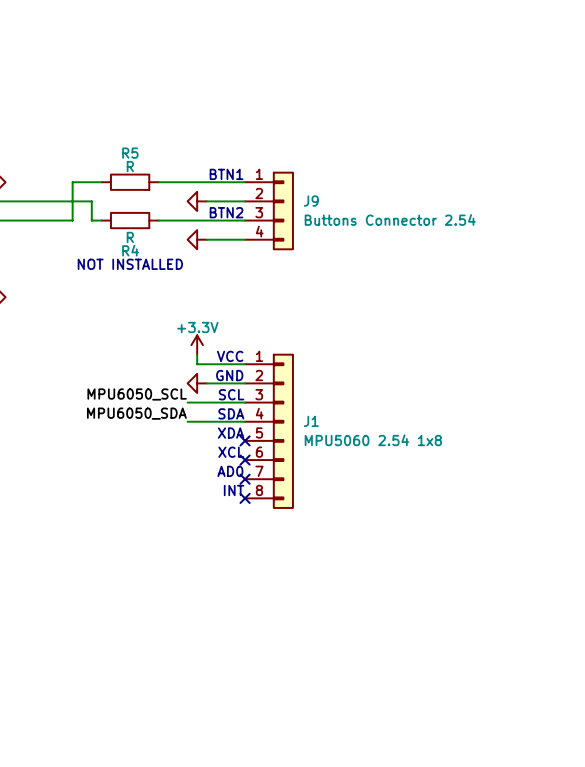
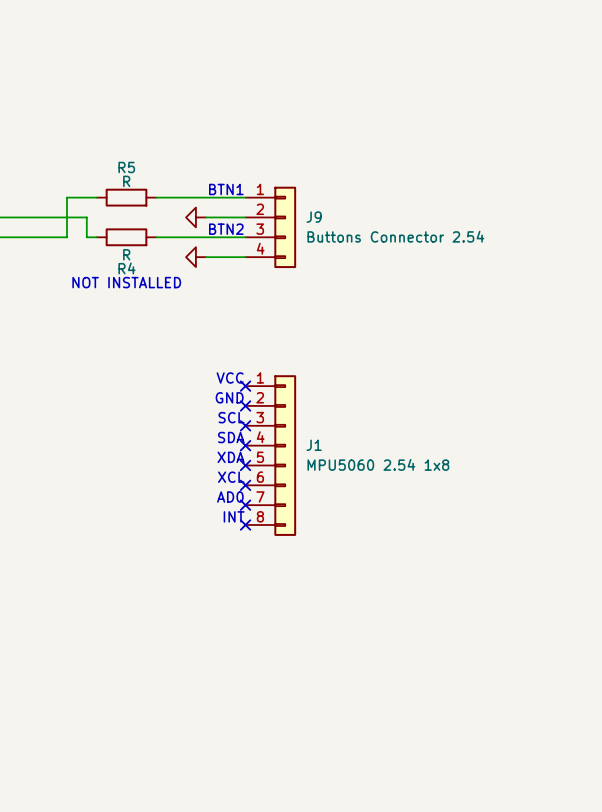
power symbol: +3.3V (197, 345) -> none
wire: (197, 354) (197, 364) (245, 364) -> none
no-connect mark: none -> (245, 386)
power symbol: (197, 383) -> none
wire: (206, 383) (245, 383) -> none
no-connect mark: none -> (245, 405)
label: MPU6050_SCL (137, 394) -> none
wire: (187, 402) (245, 402) -> none
no-connect mark: none -> (245, 425)
label: MPU6050_SDA (136, 413) -> none
wire: (187, 421) (245, 421) -> none
no-connect mark: none -> (245, 445)

